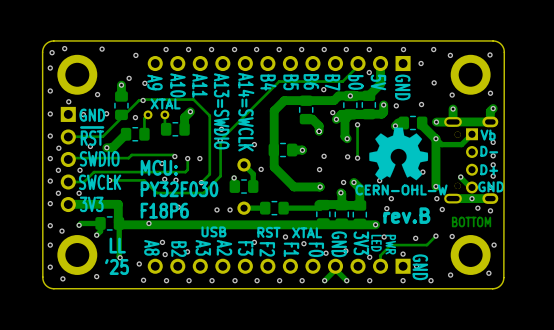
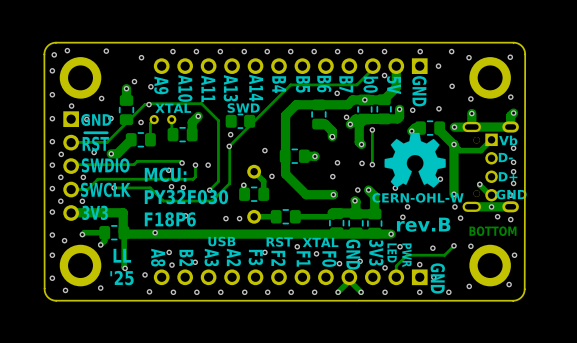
text: none -> SWD (243, 108)
text: A13=SWDIO (221, 111) -> A13 (230, 88)
text: A14=SWCLK (246, 112) -> A14 (256, 88)
part: none -> (240, 121)

